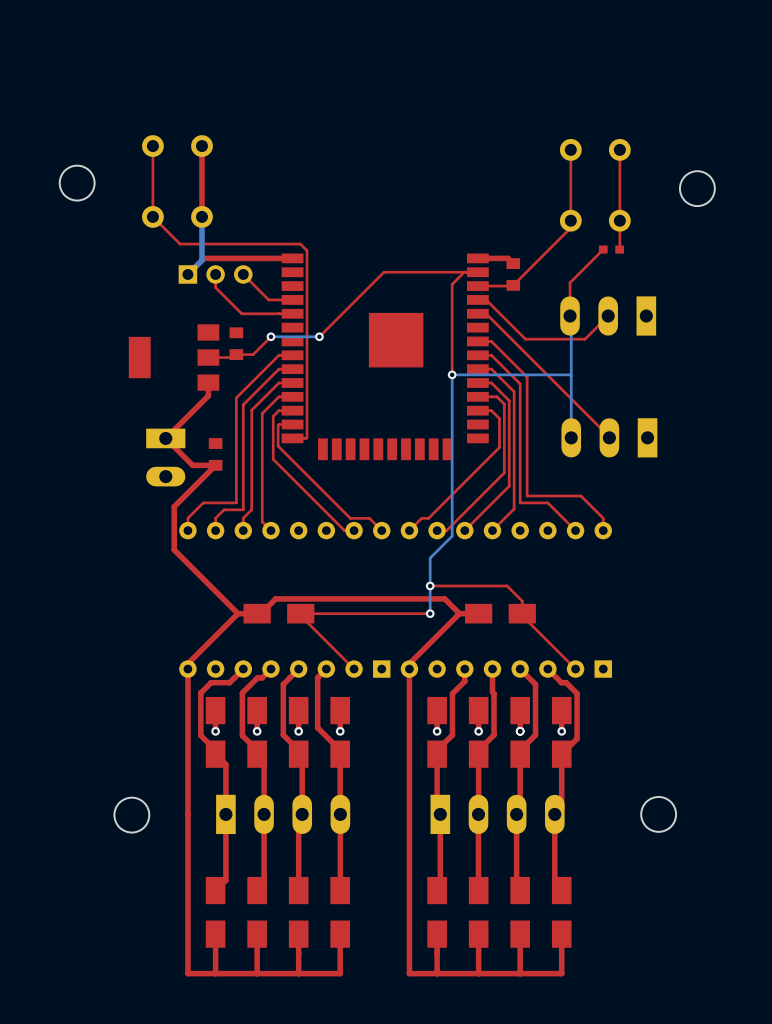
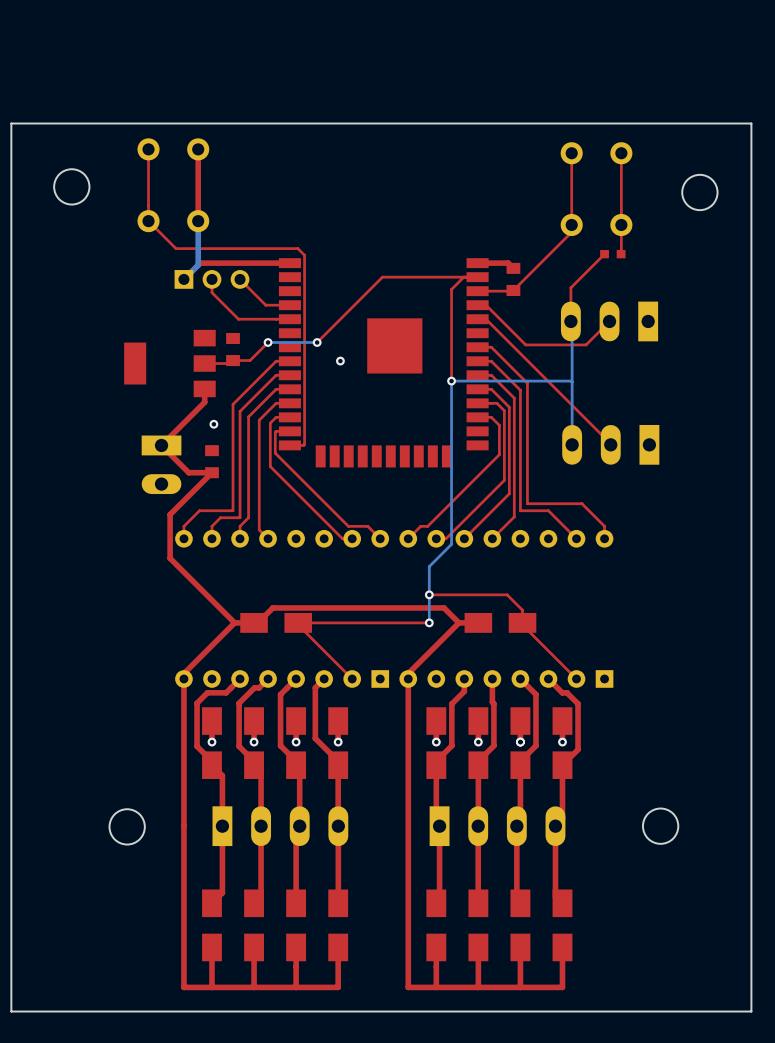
board edge: none -> (751, 123) (751, 1011) (11, 1011) (11, 123) (751, 123)
via: none -> (340, 361)
via: none -> (213, 424)

